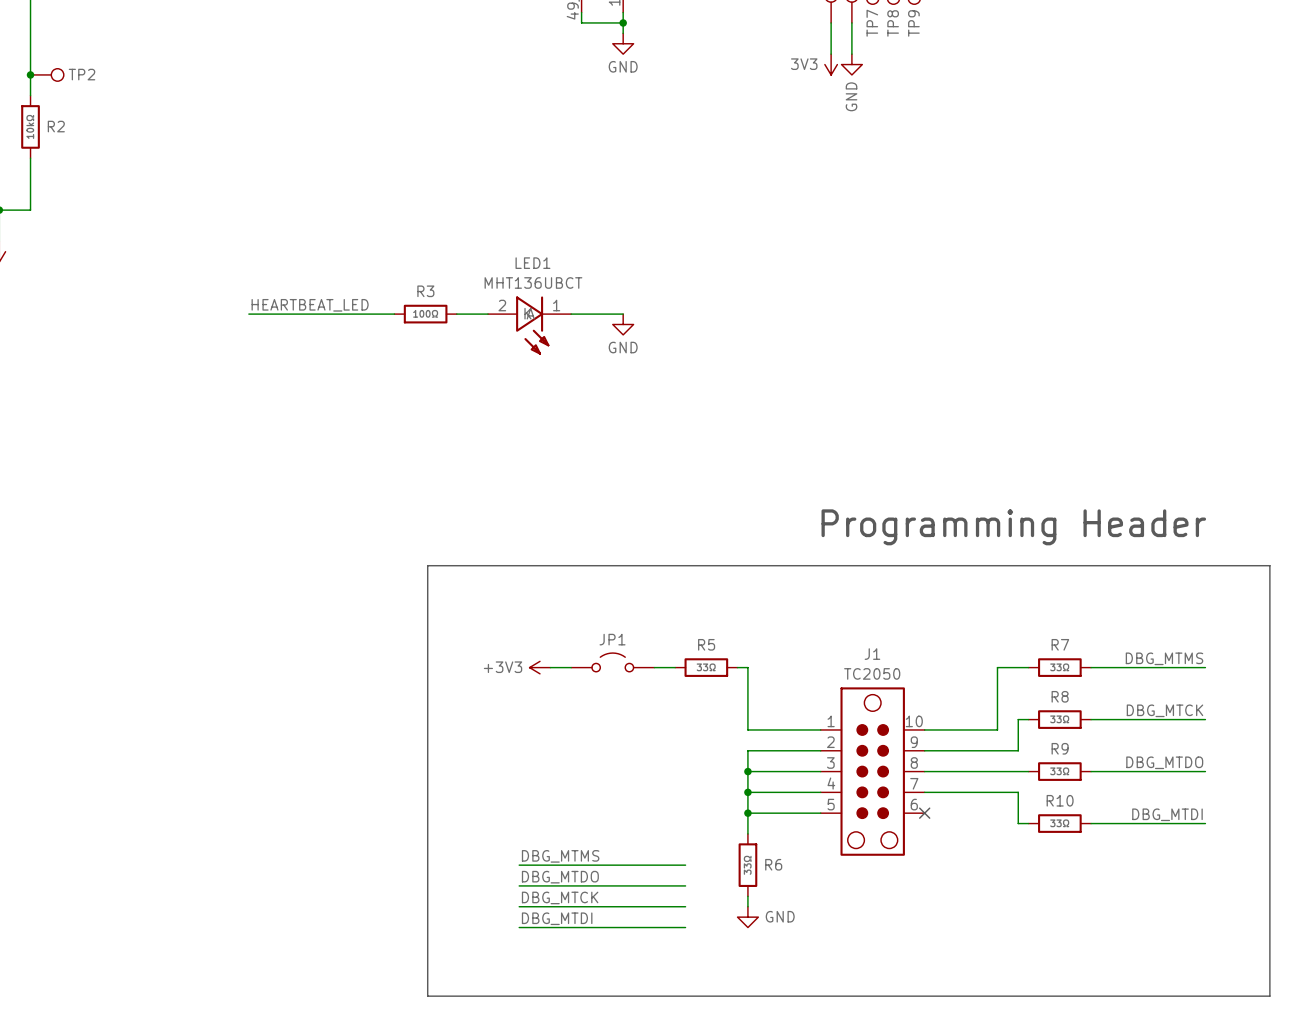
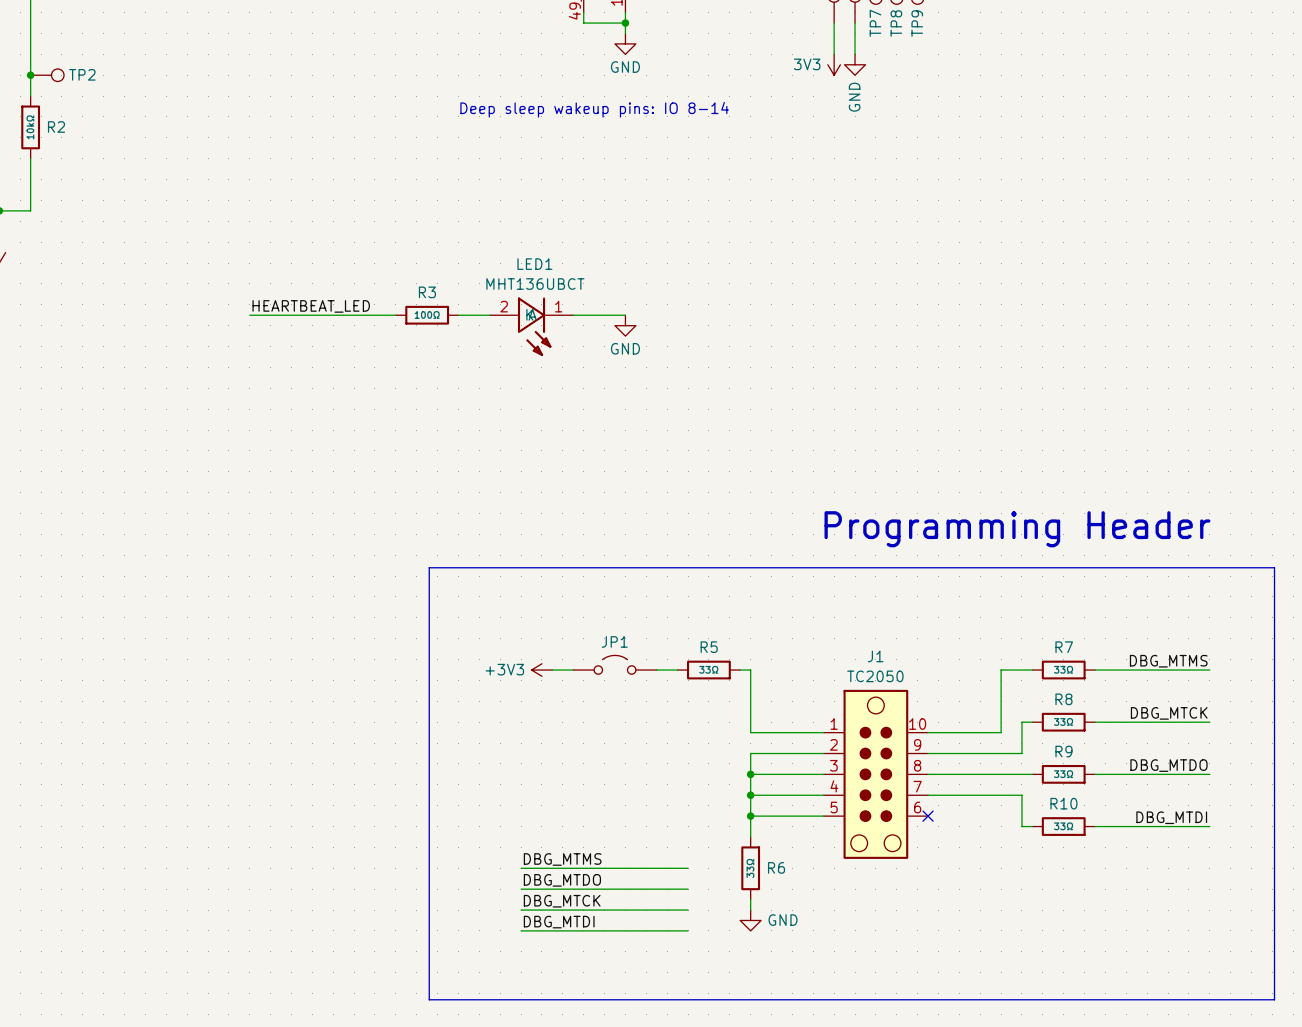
text: none -> Deep sleep wakeup pins: IO 8-14 (594, 109)

